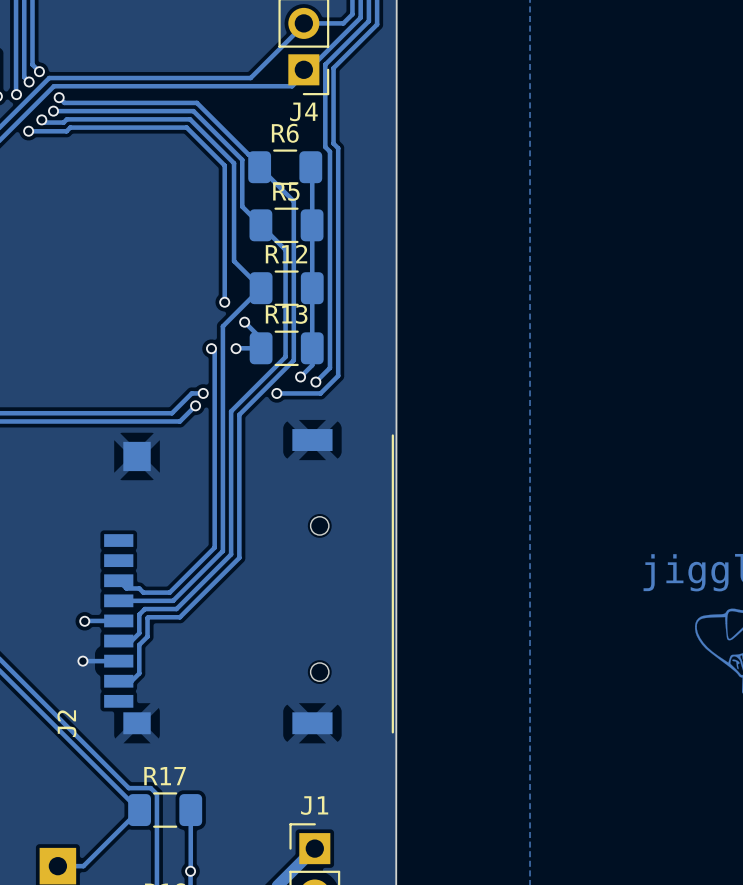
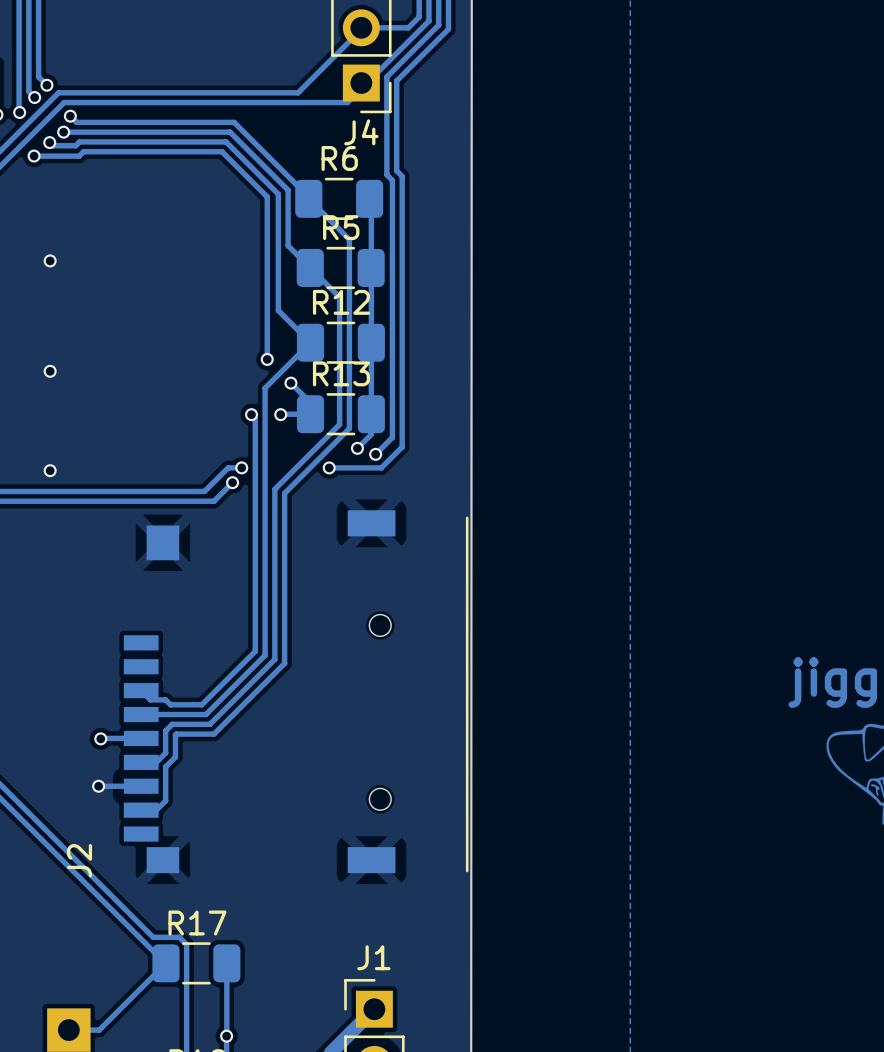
via: none -> (50, 260)
via: none -> (50, 371)
via: none -> (50, 470)

